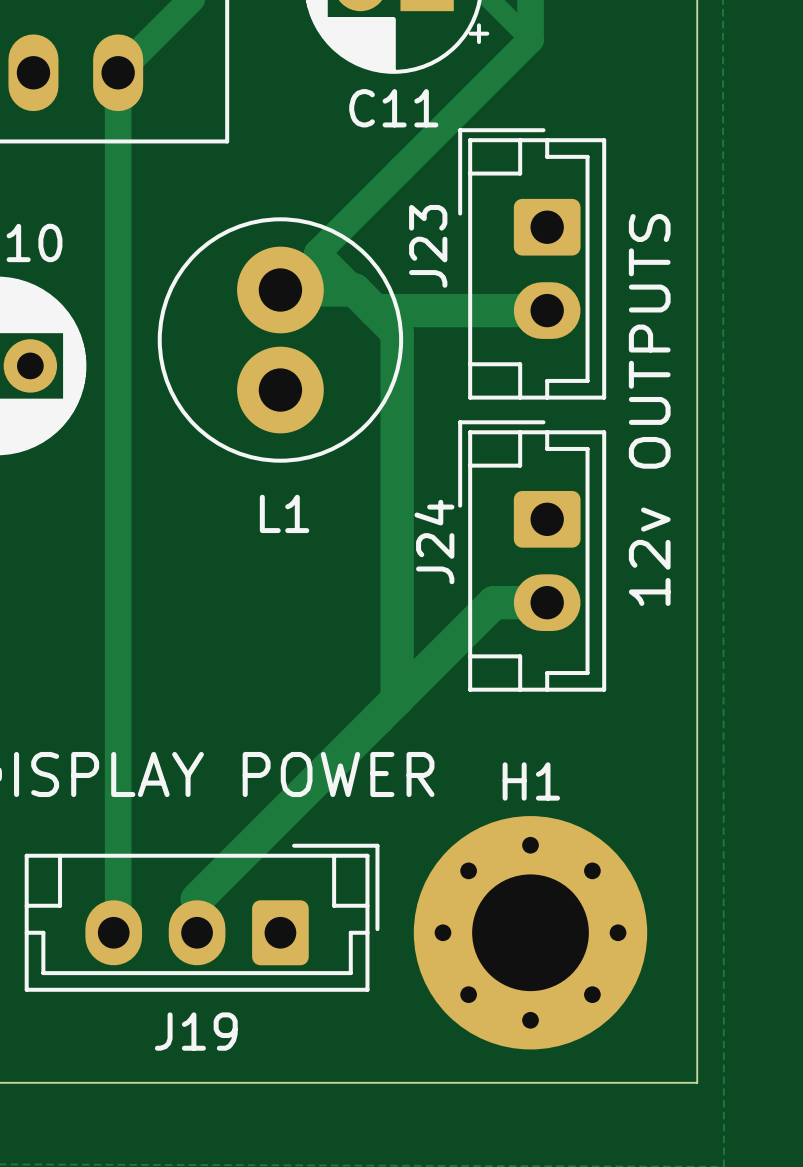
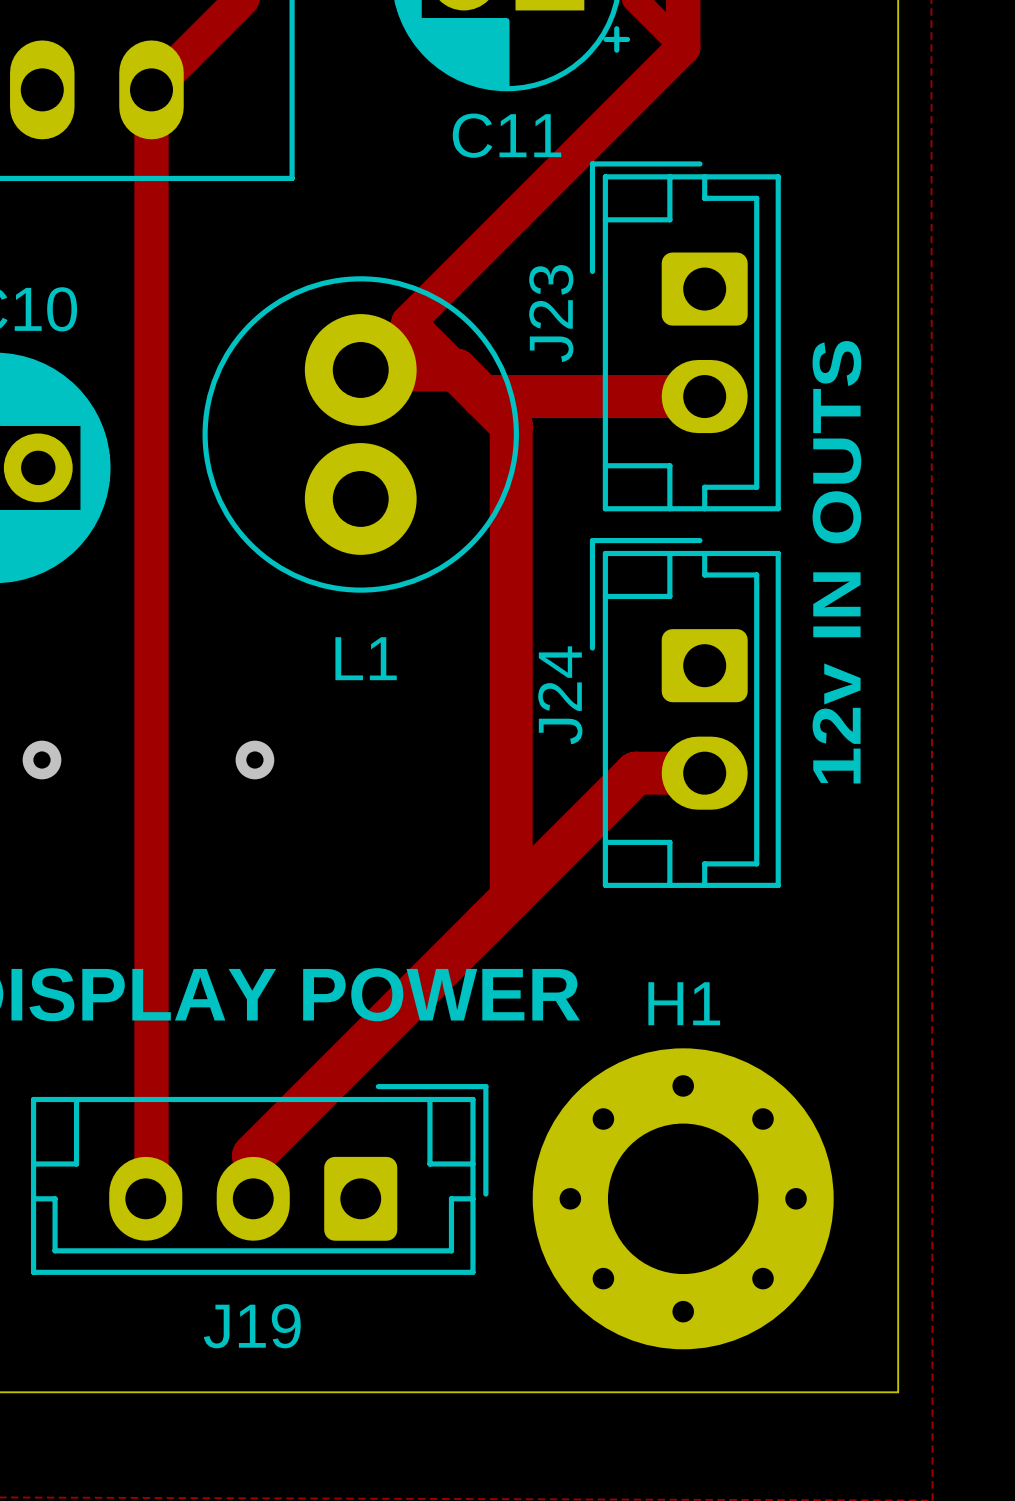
text: 12v OUTPUTS (649, 409) -> 12v IN OUTS (836, 562)
via: none -> (41, 760)
via: none -> (254, 760)

